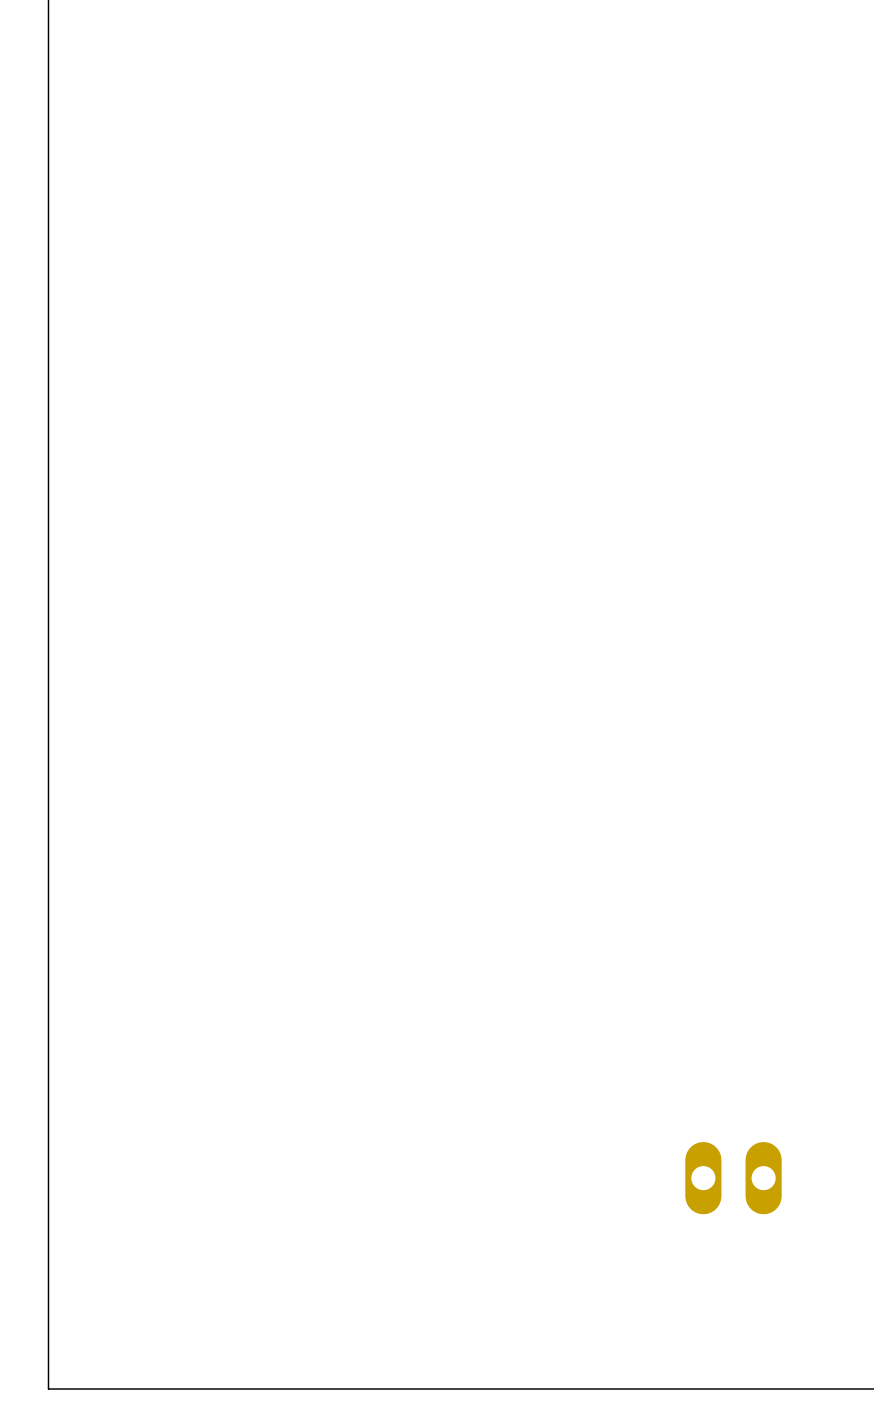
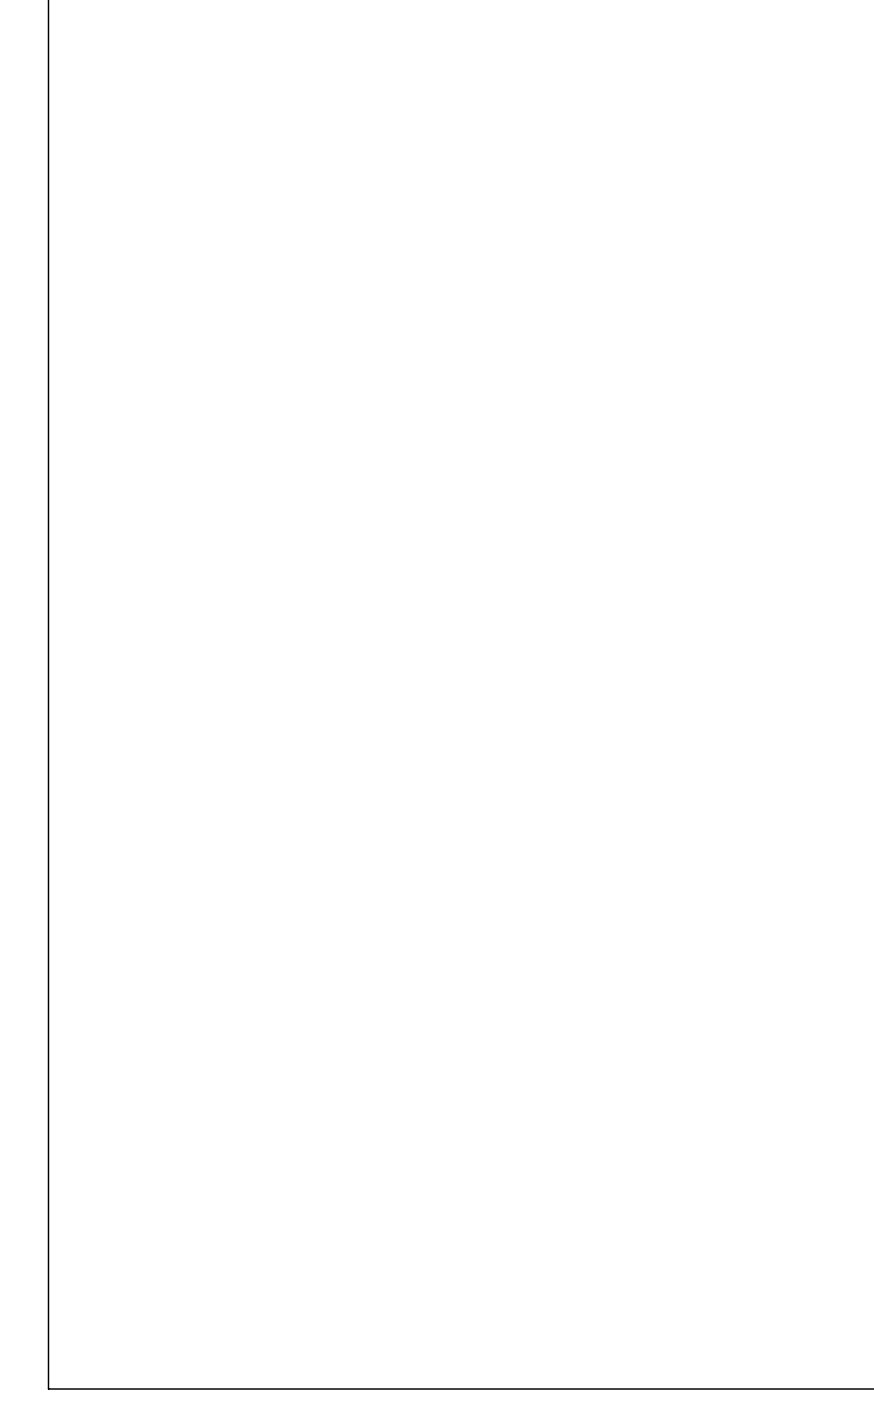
part: (733, 1178) -> none

